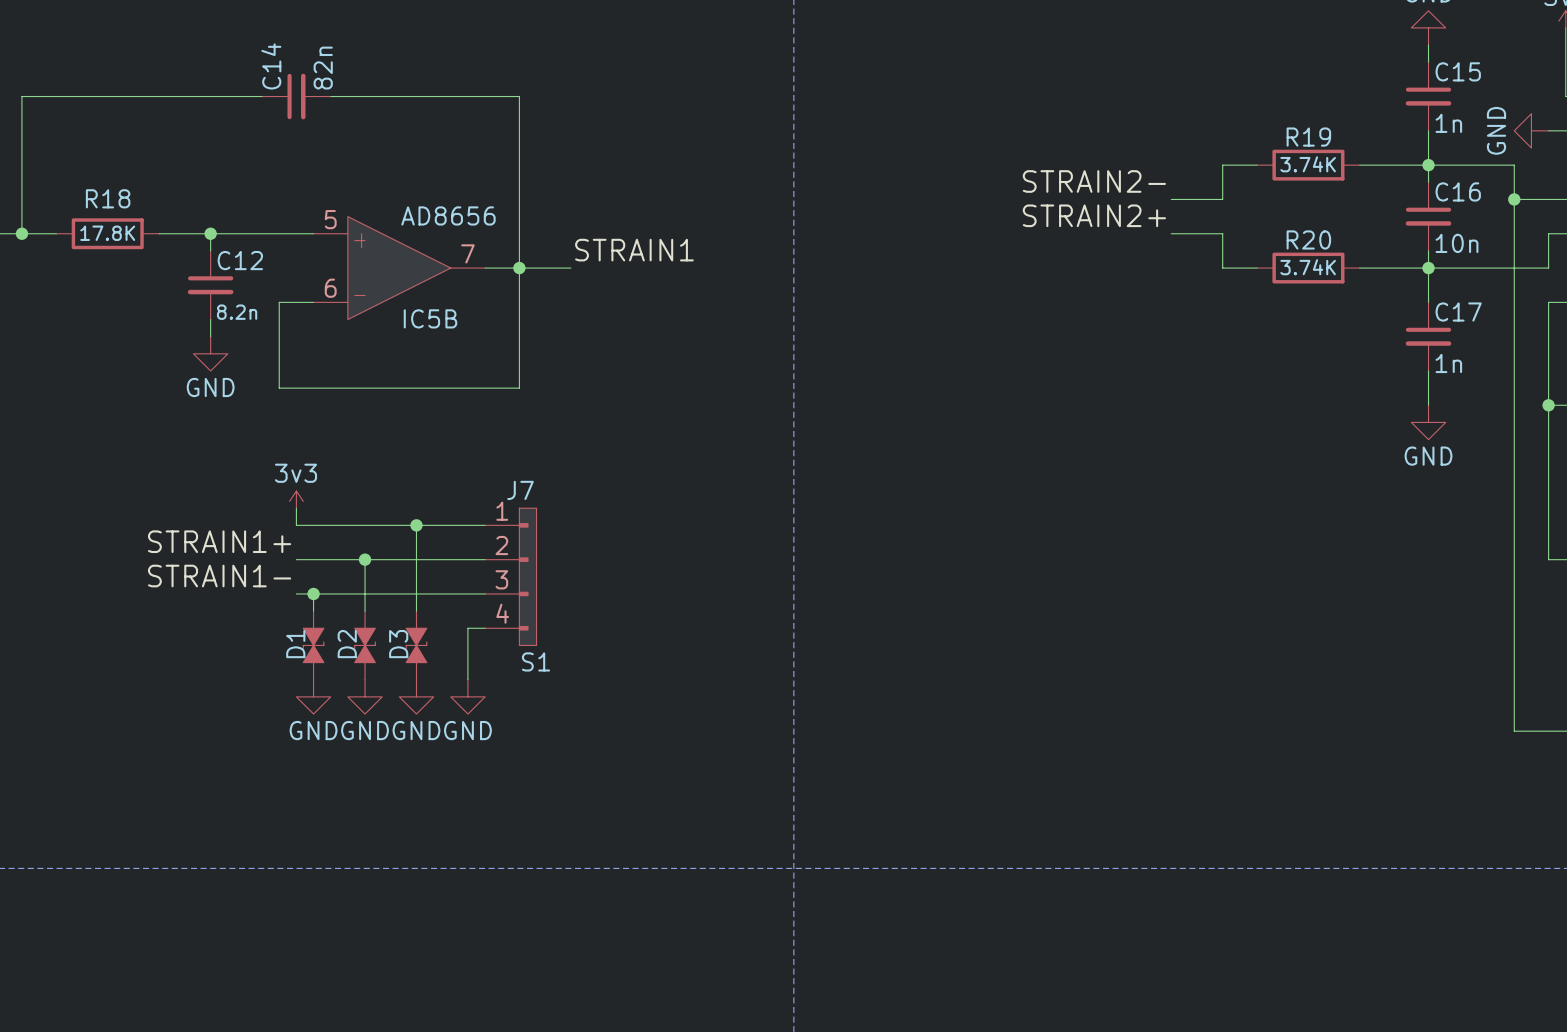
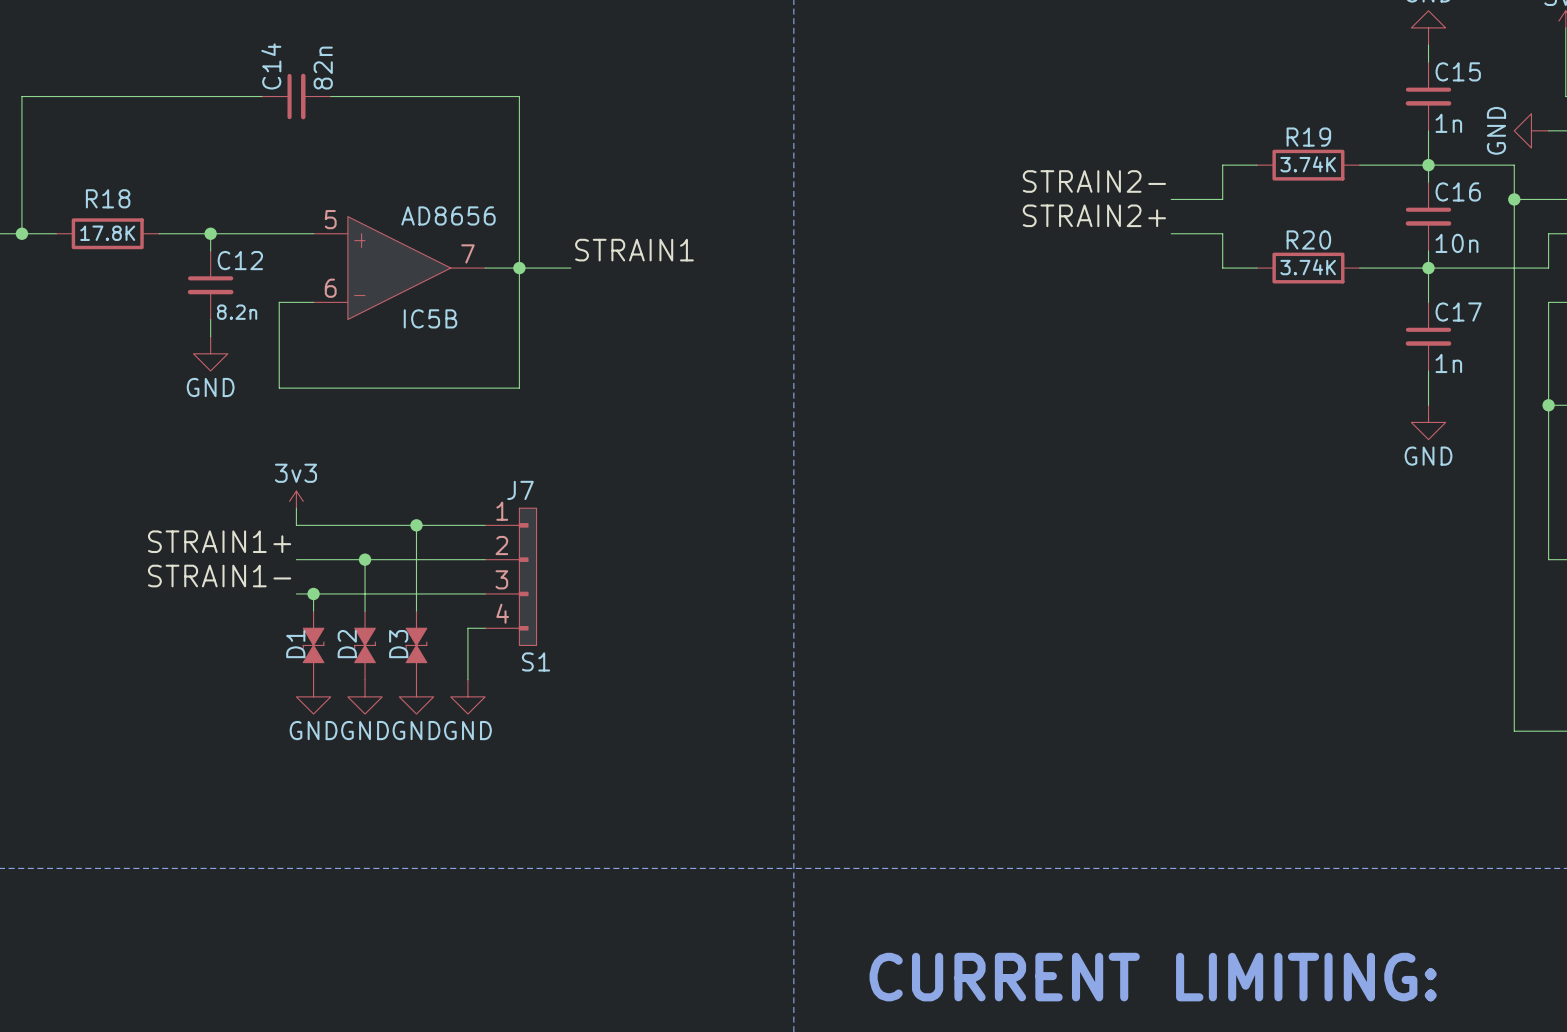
text: none -> CURRENT LIMITING: (1153, 977)

